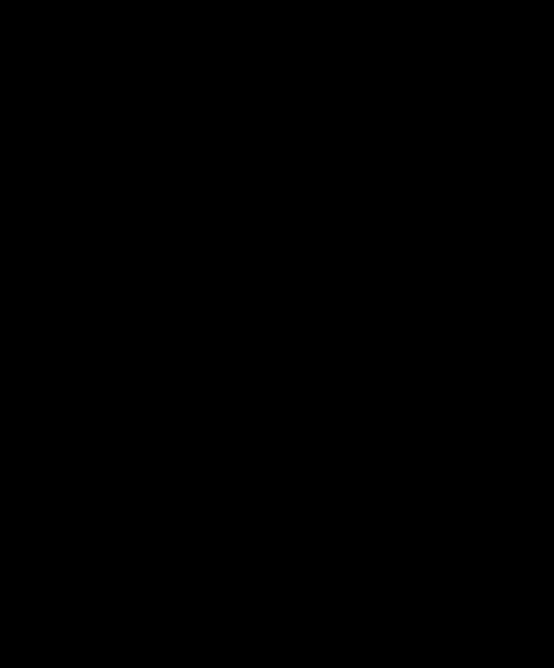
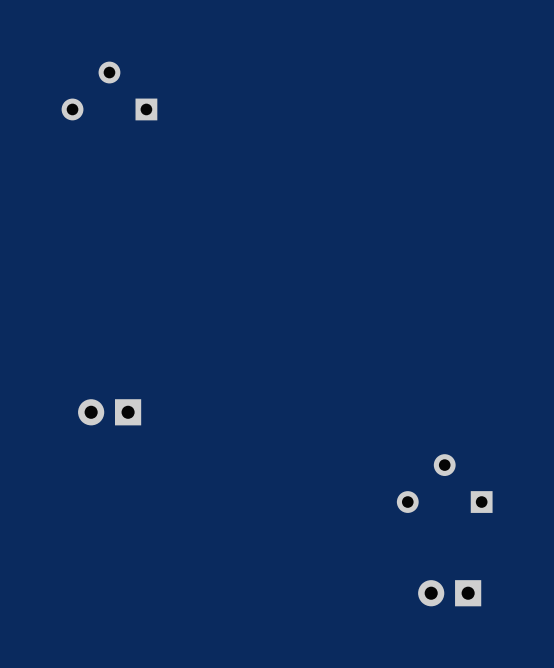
part: none -> (109, 91)
part: none -> (109, 412)
part: none -> (444, 483)
part: none -> (449, 593)

